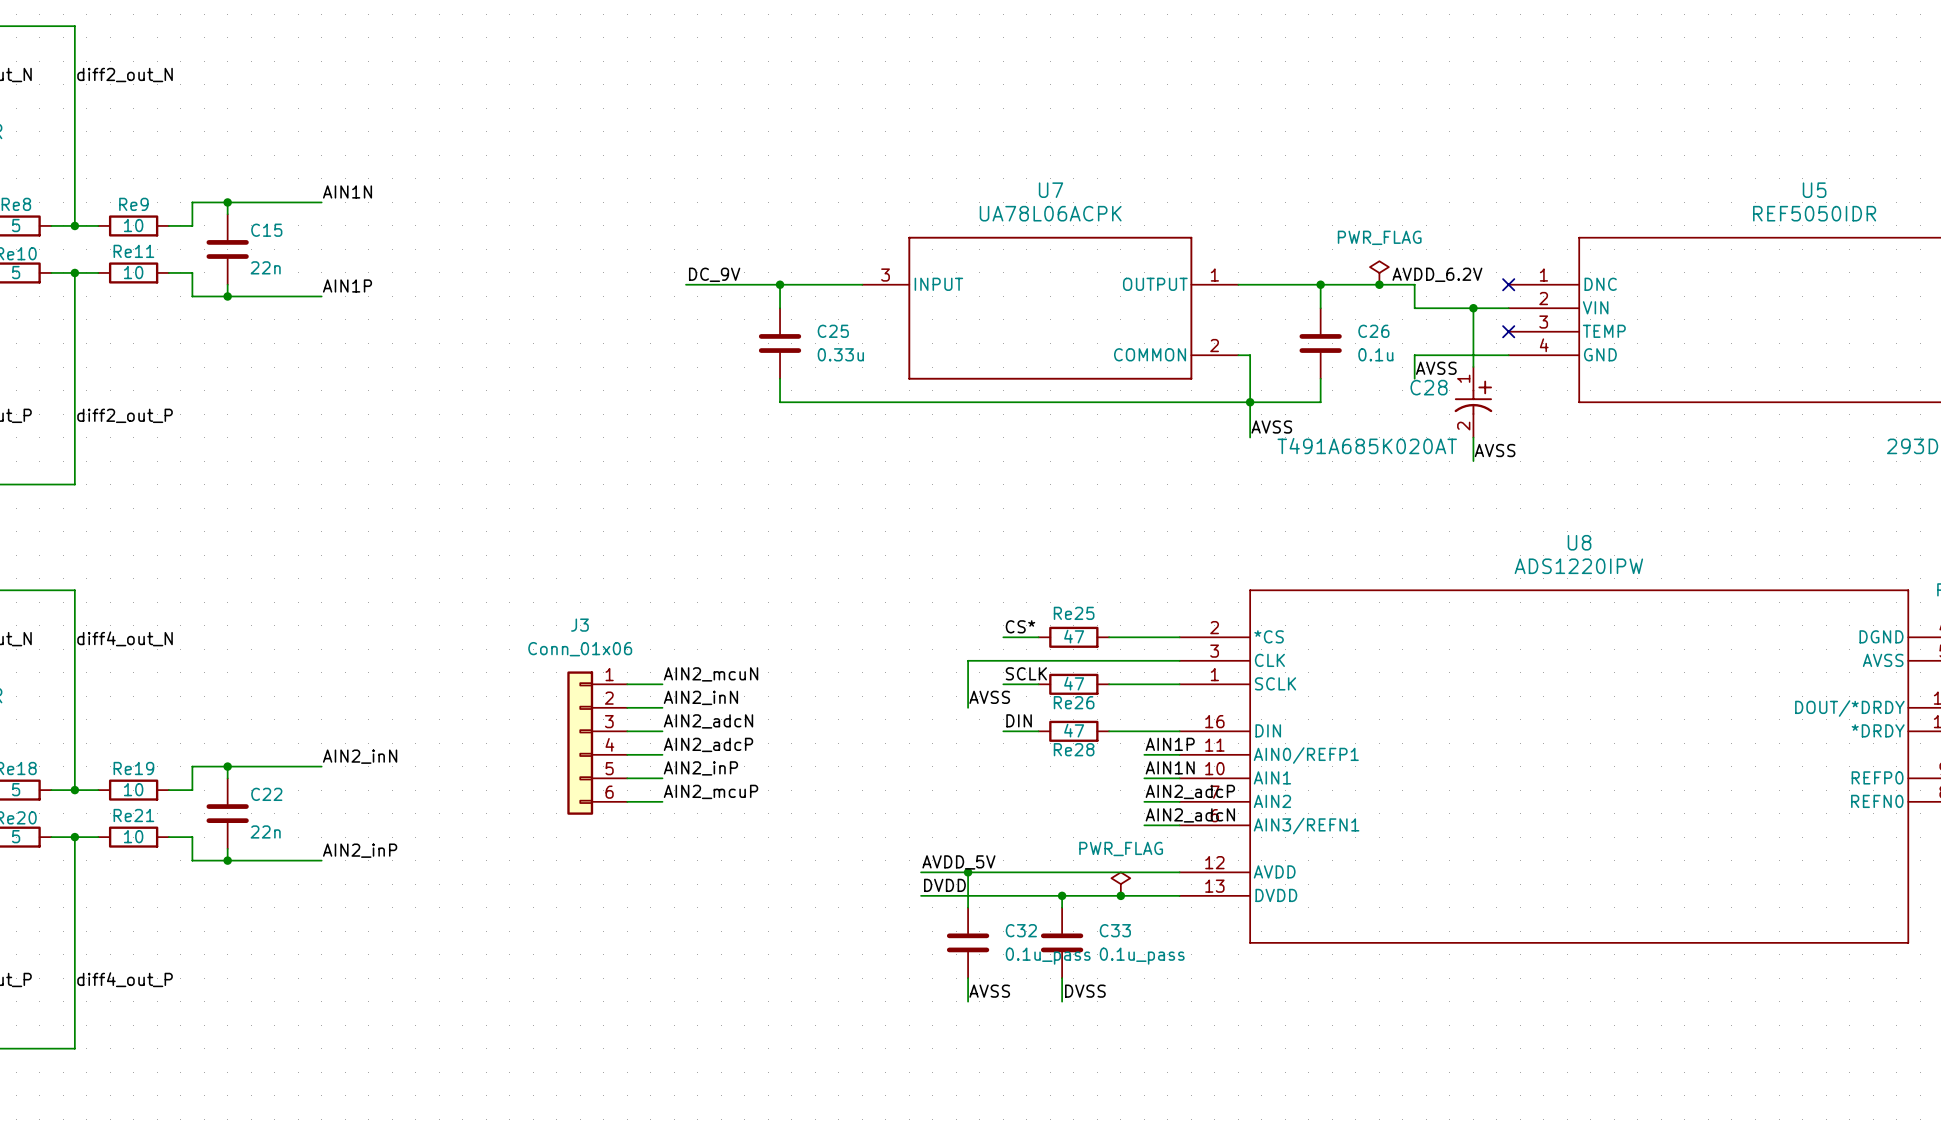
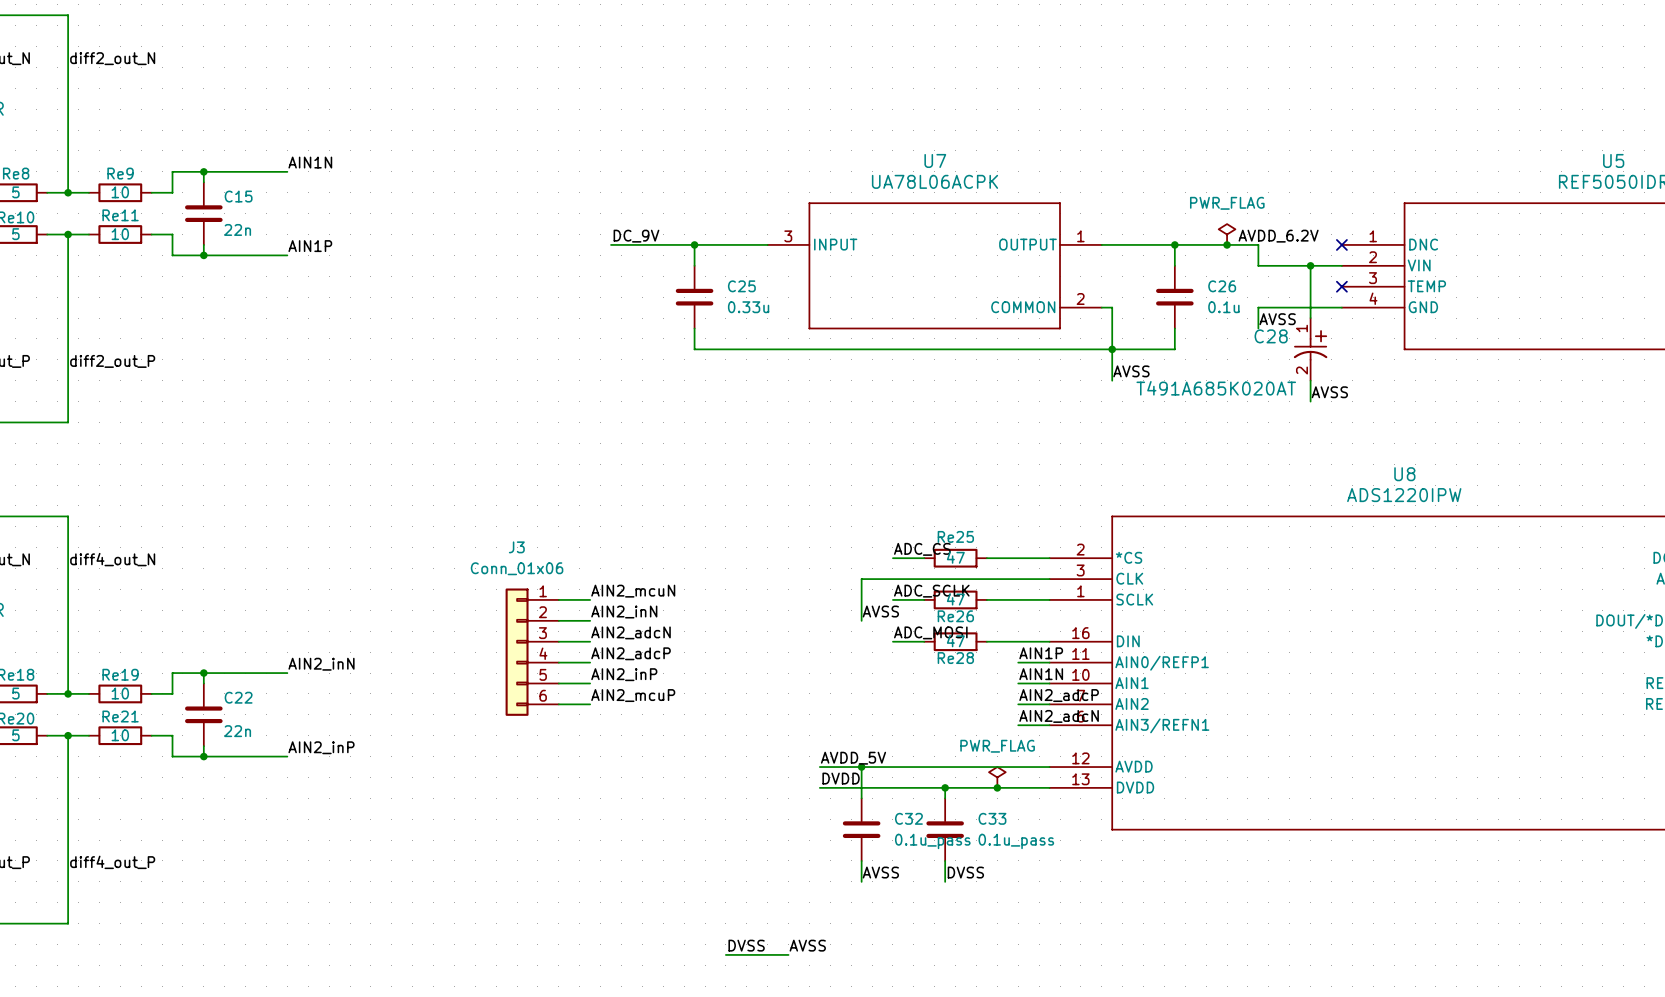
label: CS* (1020, 626) -> ADC_CS (922, 549)
label: SCLK (1026, 673) -> ADC_SCLK (931, 591)
label: DIN (1019, 720) -> ADC_MOSI (930, 632)
label: none -> DVSS (746, 945)
label: none -> AVSS (807, 945)
wire: none -> (725, 954) (788, 954)

